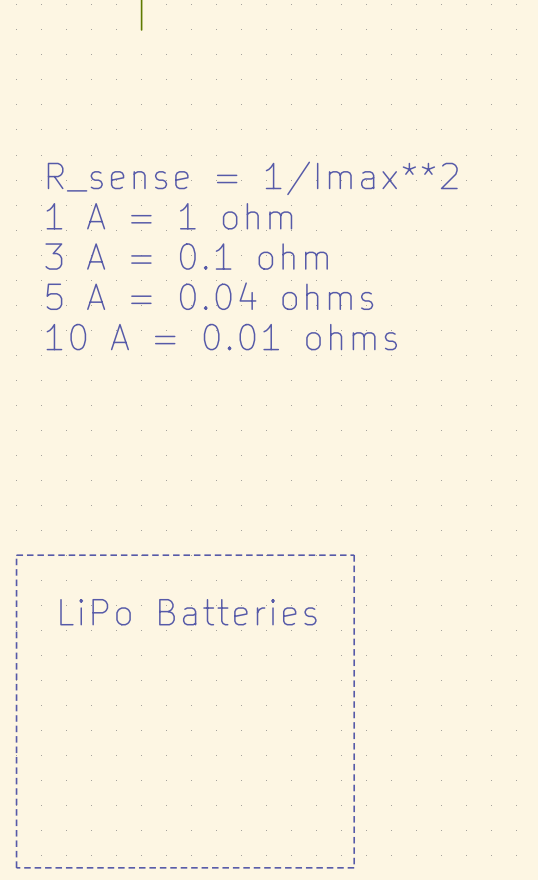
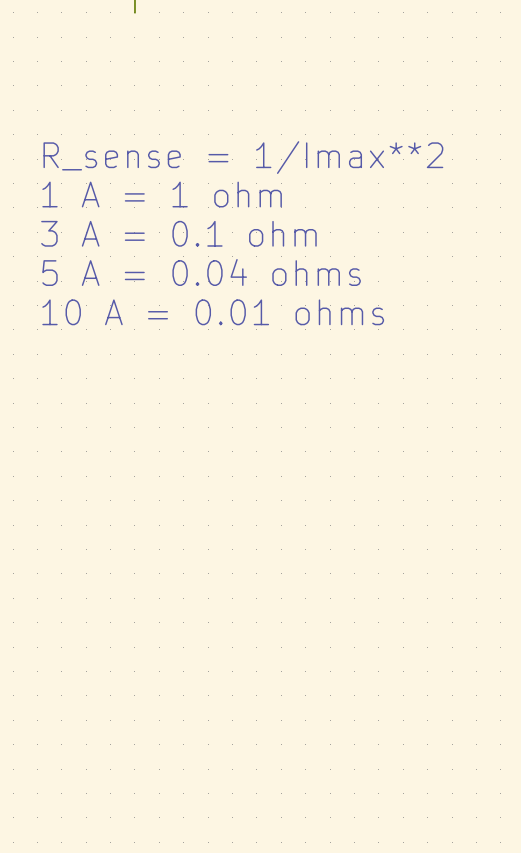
line: (16, 555) (354, 555) (354, 867) (16, 867) (16, 555) -> none
text: LiPo Batteries (188, 612) -> none

